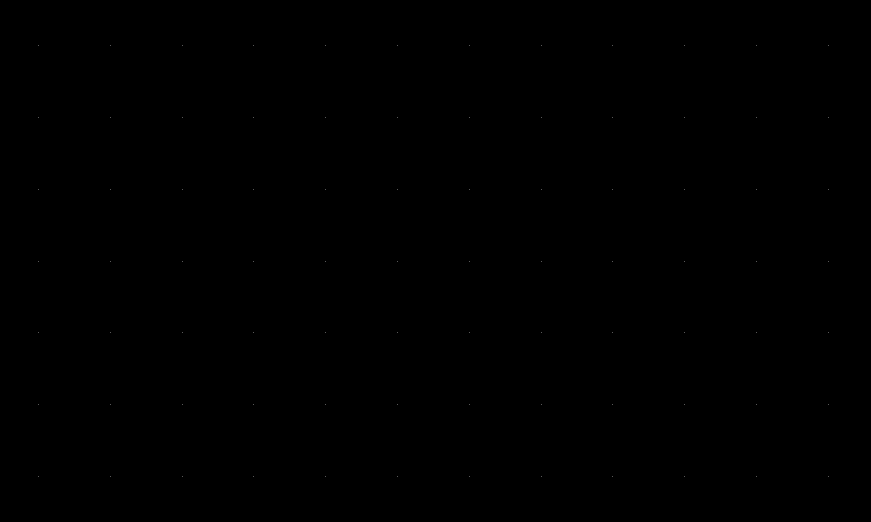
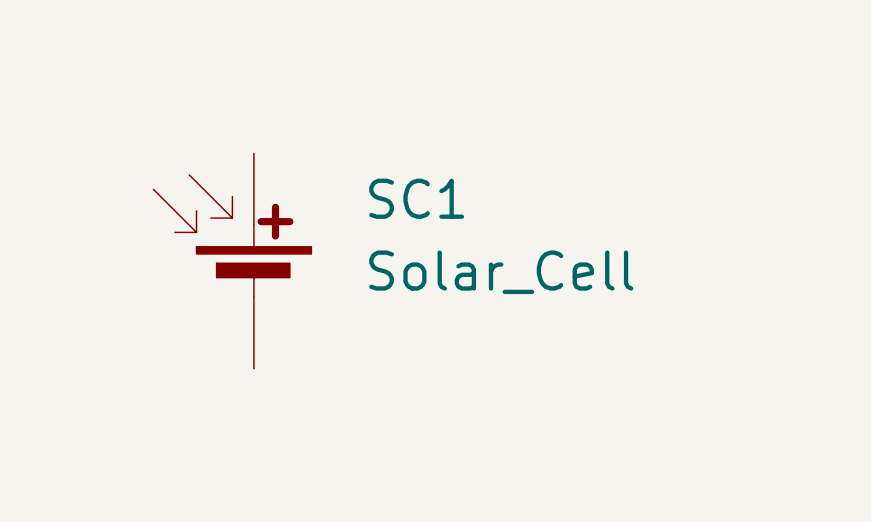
SC1: none -> Solar_Cell (232, 261)

